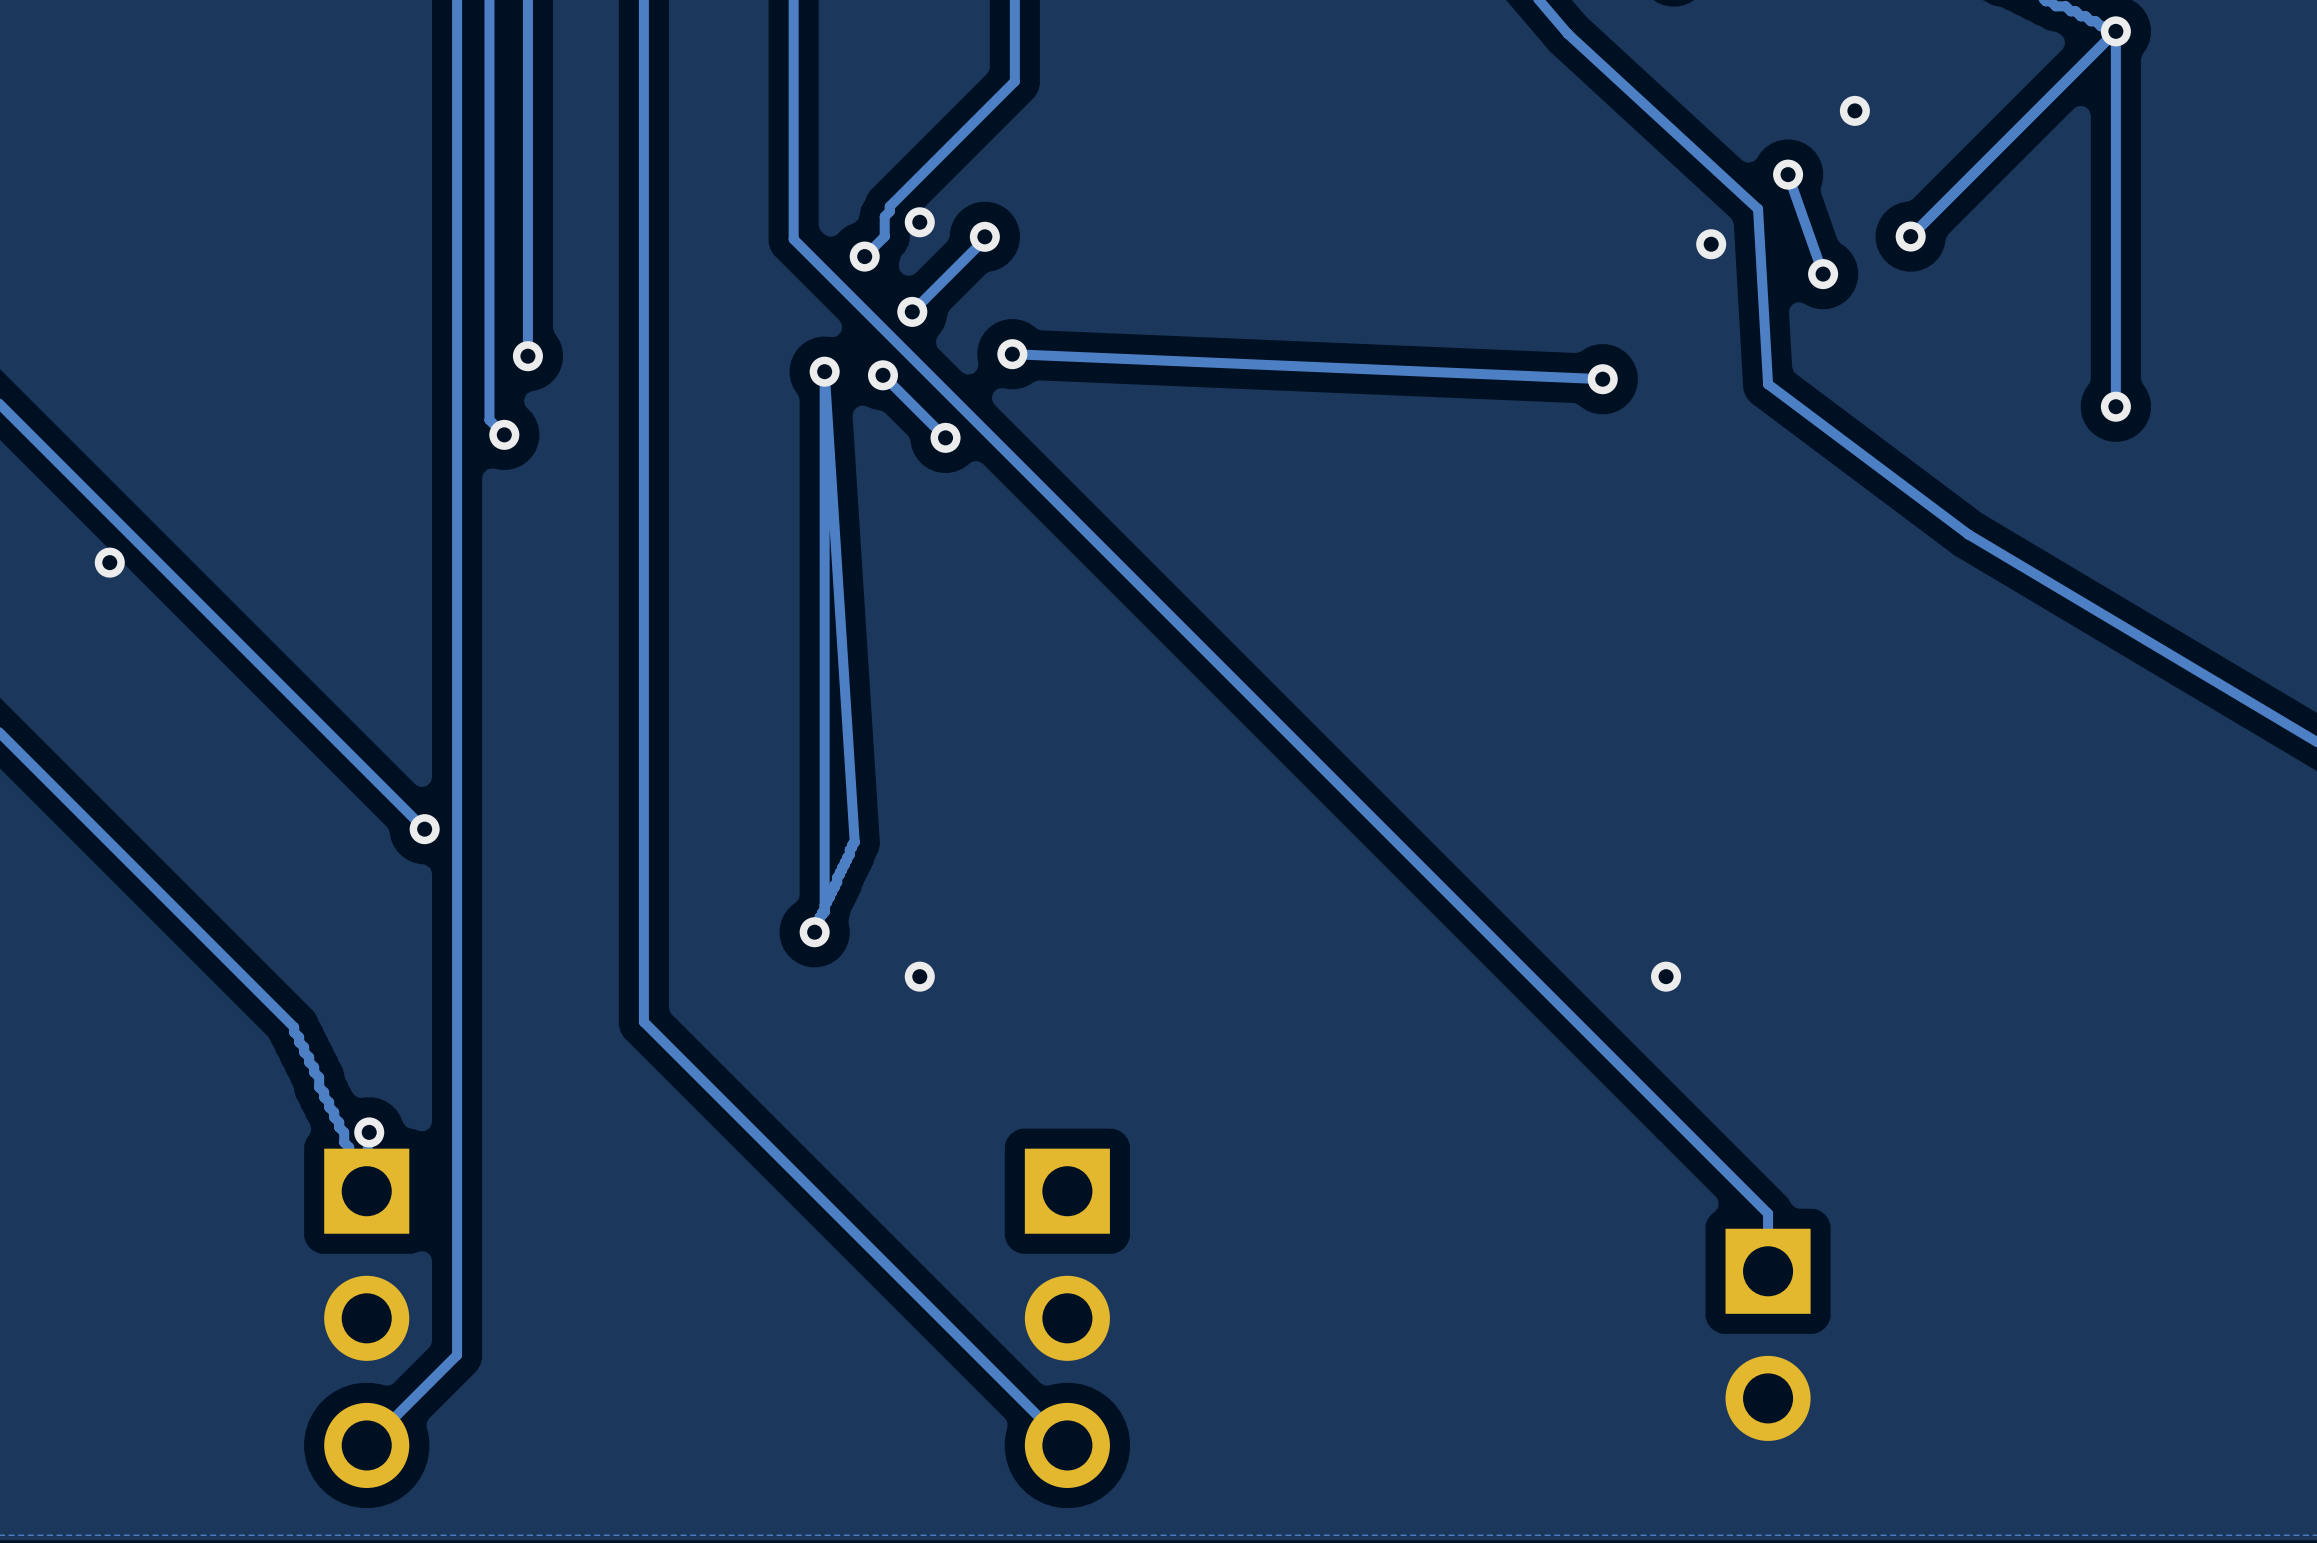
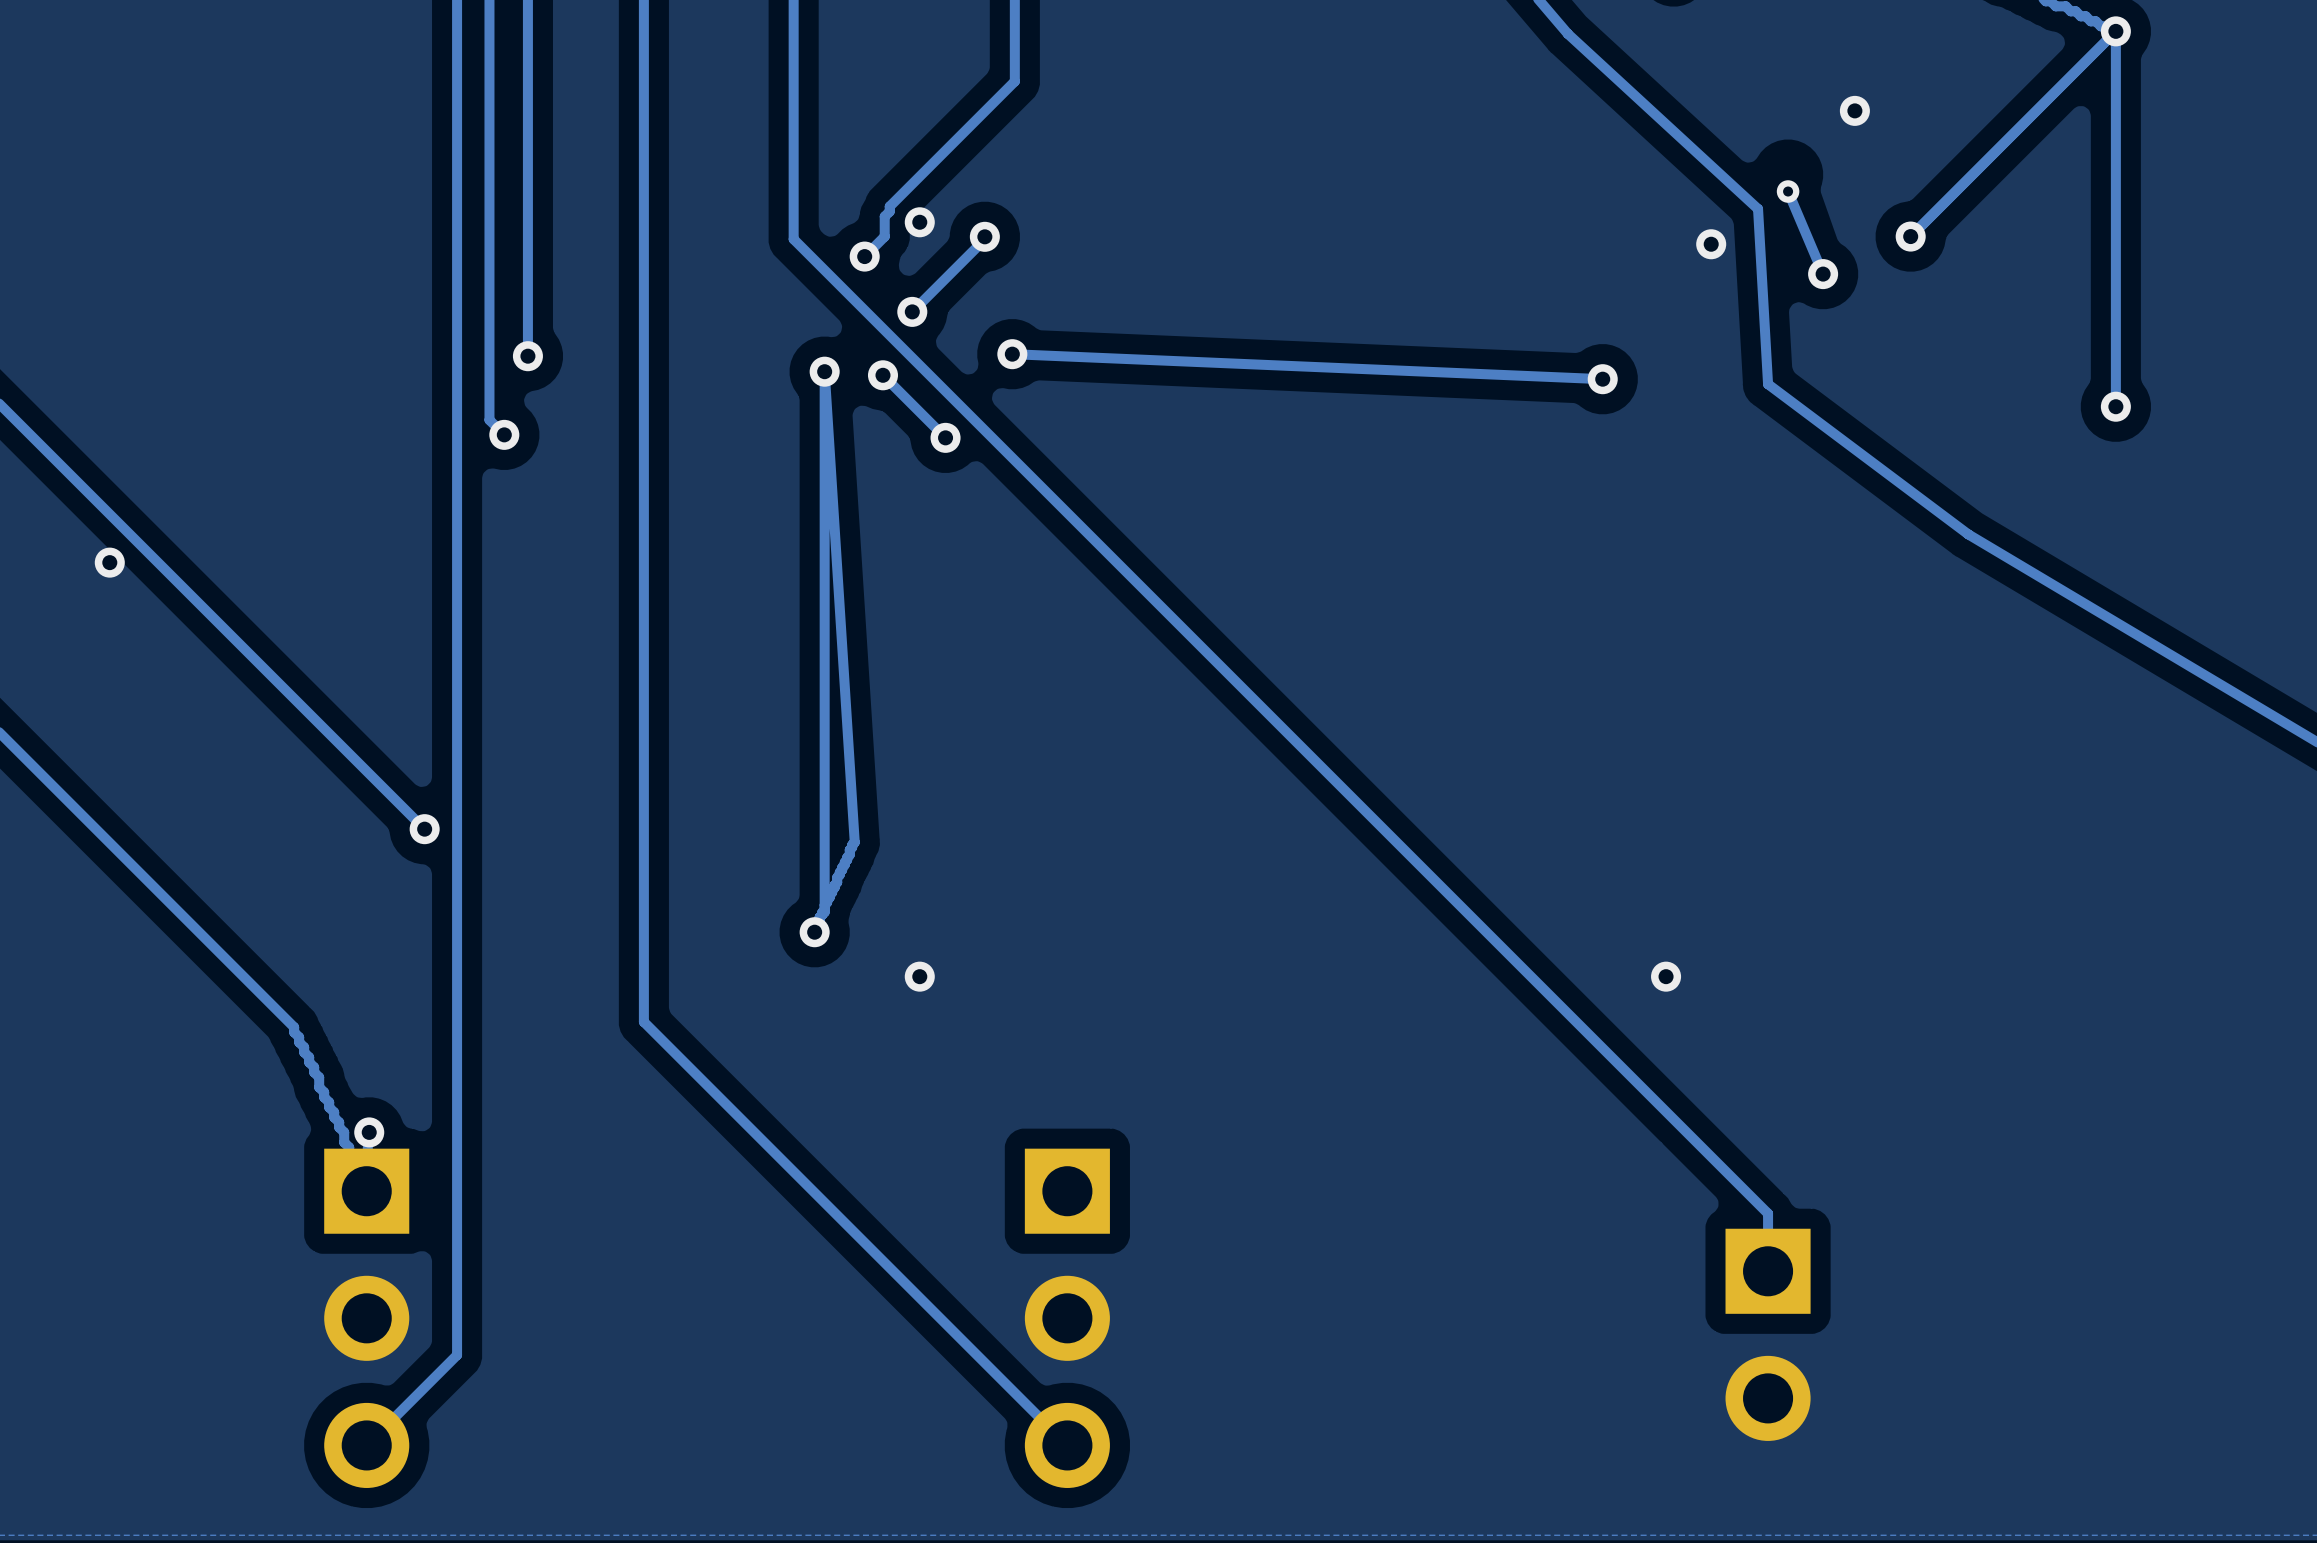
track: (1788, 174) (1823, 274) -> (1788, 191) (1823, 274)
via position: (1788, 174) -> (1788, 191)

